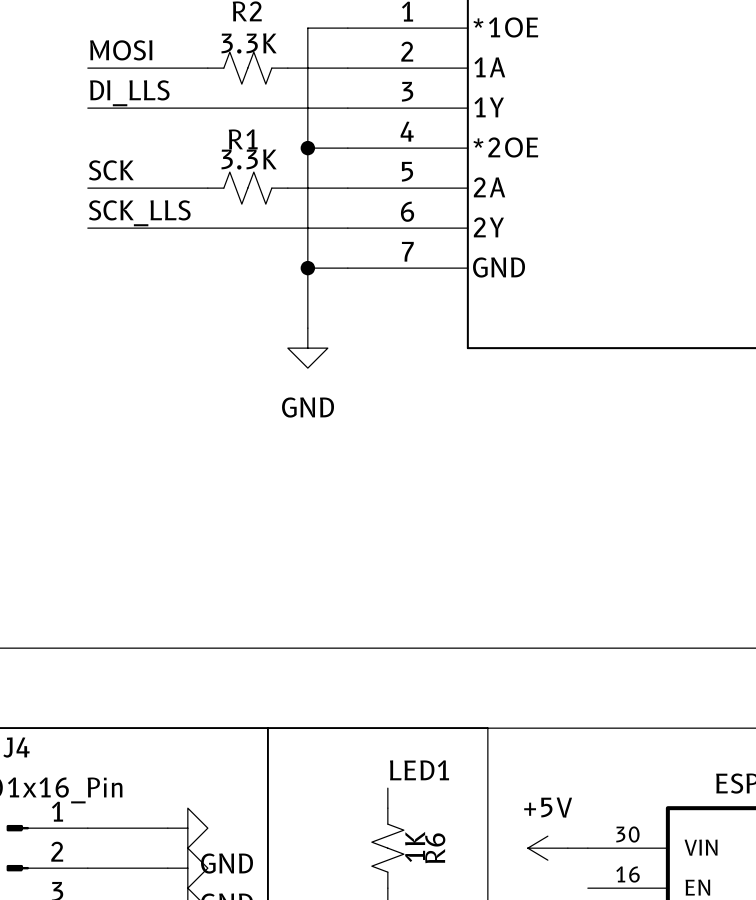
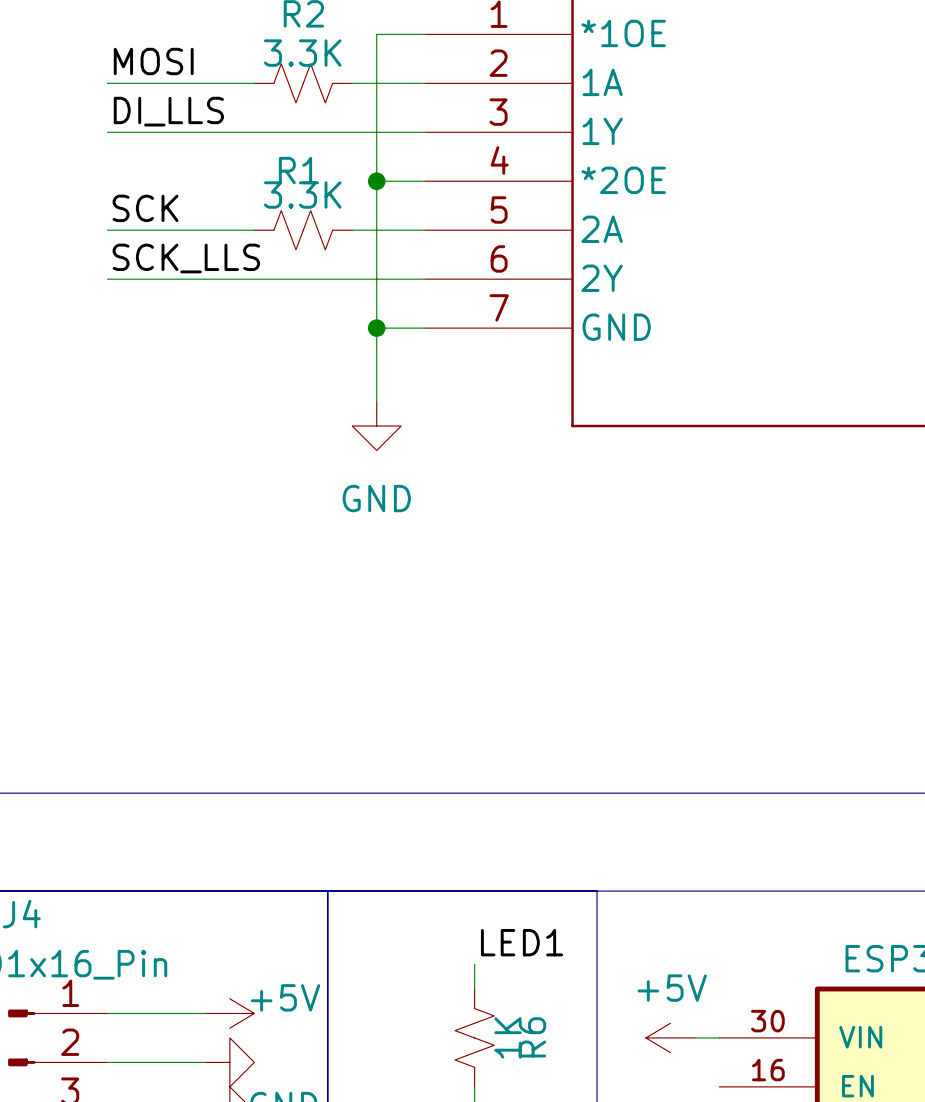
power symbol: GND (187, 828) -> +5V (229, 1013)

